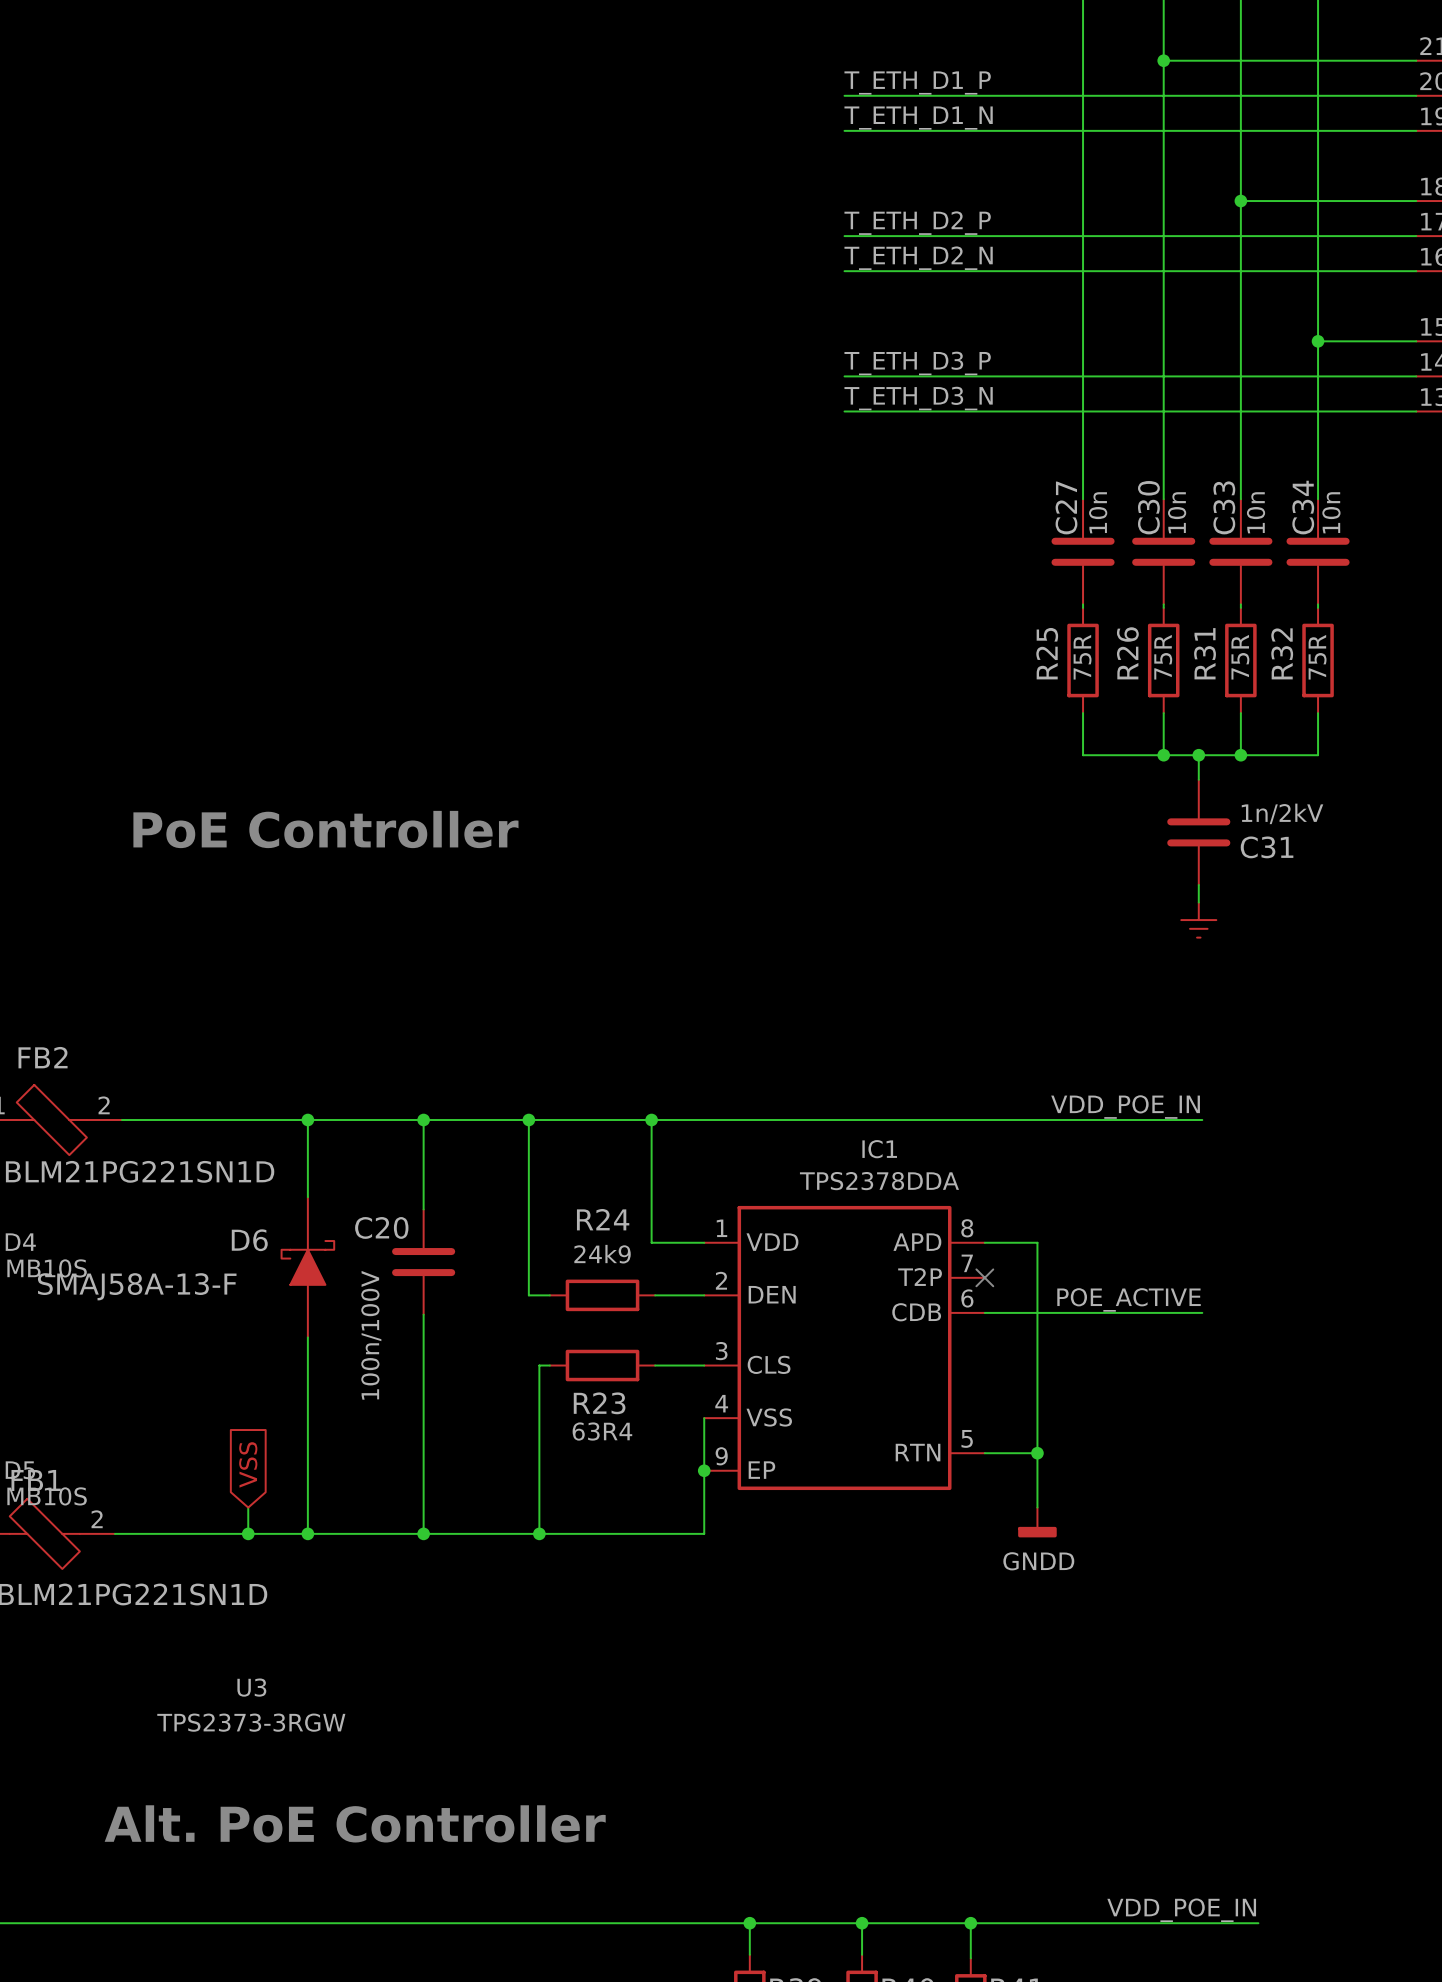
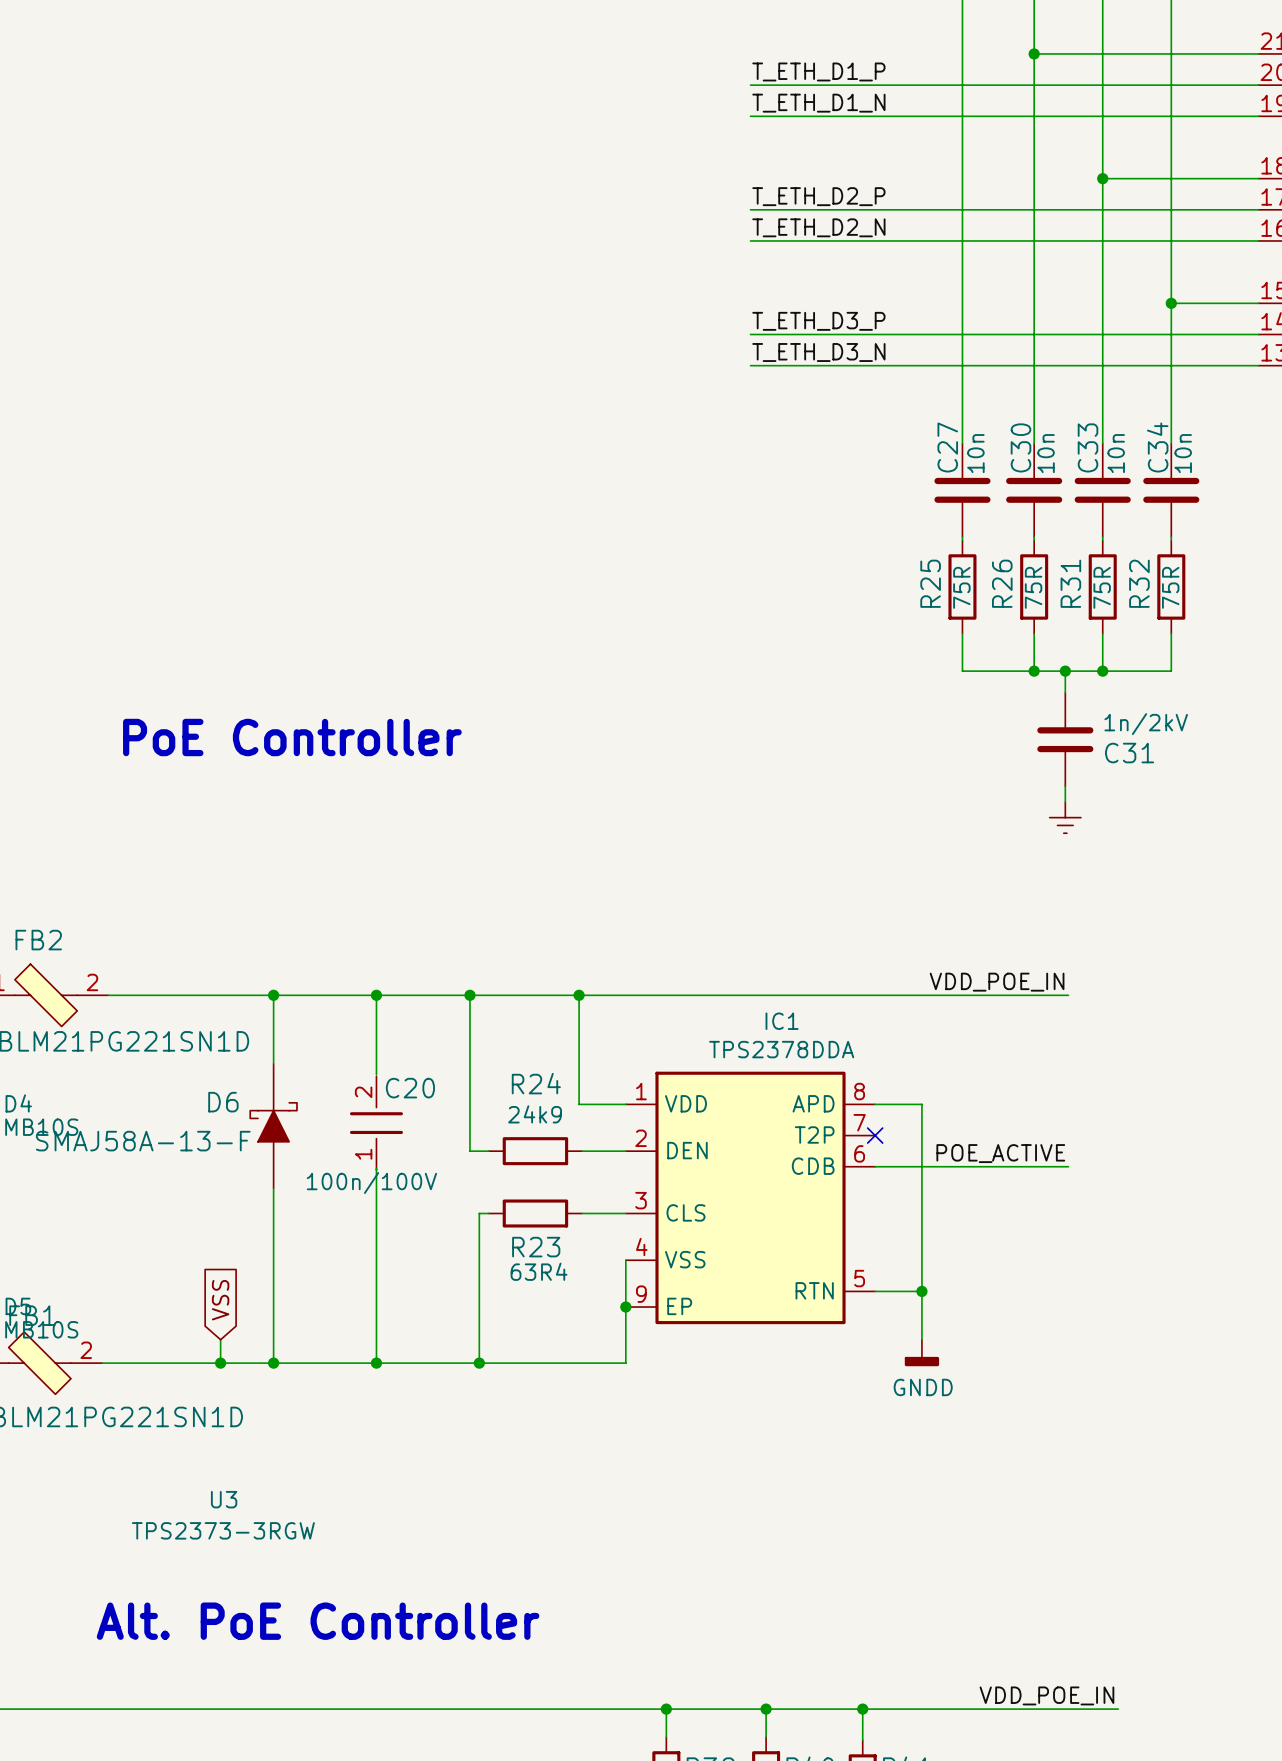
C20 symbol: [392, 1209, 456, 1315] -> [349, 1076, 403, 1170]
C20 name position: C20 (381, 1227) -> C20 (410, 1088)
C20 text position: 100n/100V (371, 1335) -> 100n/100V (371, 1182)

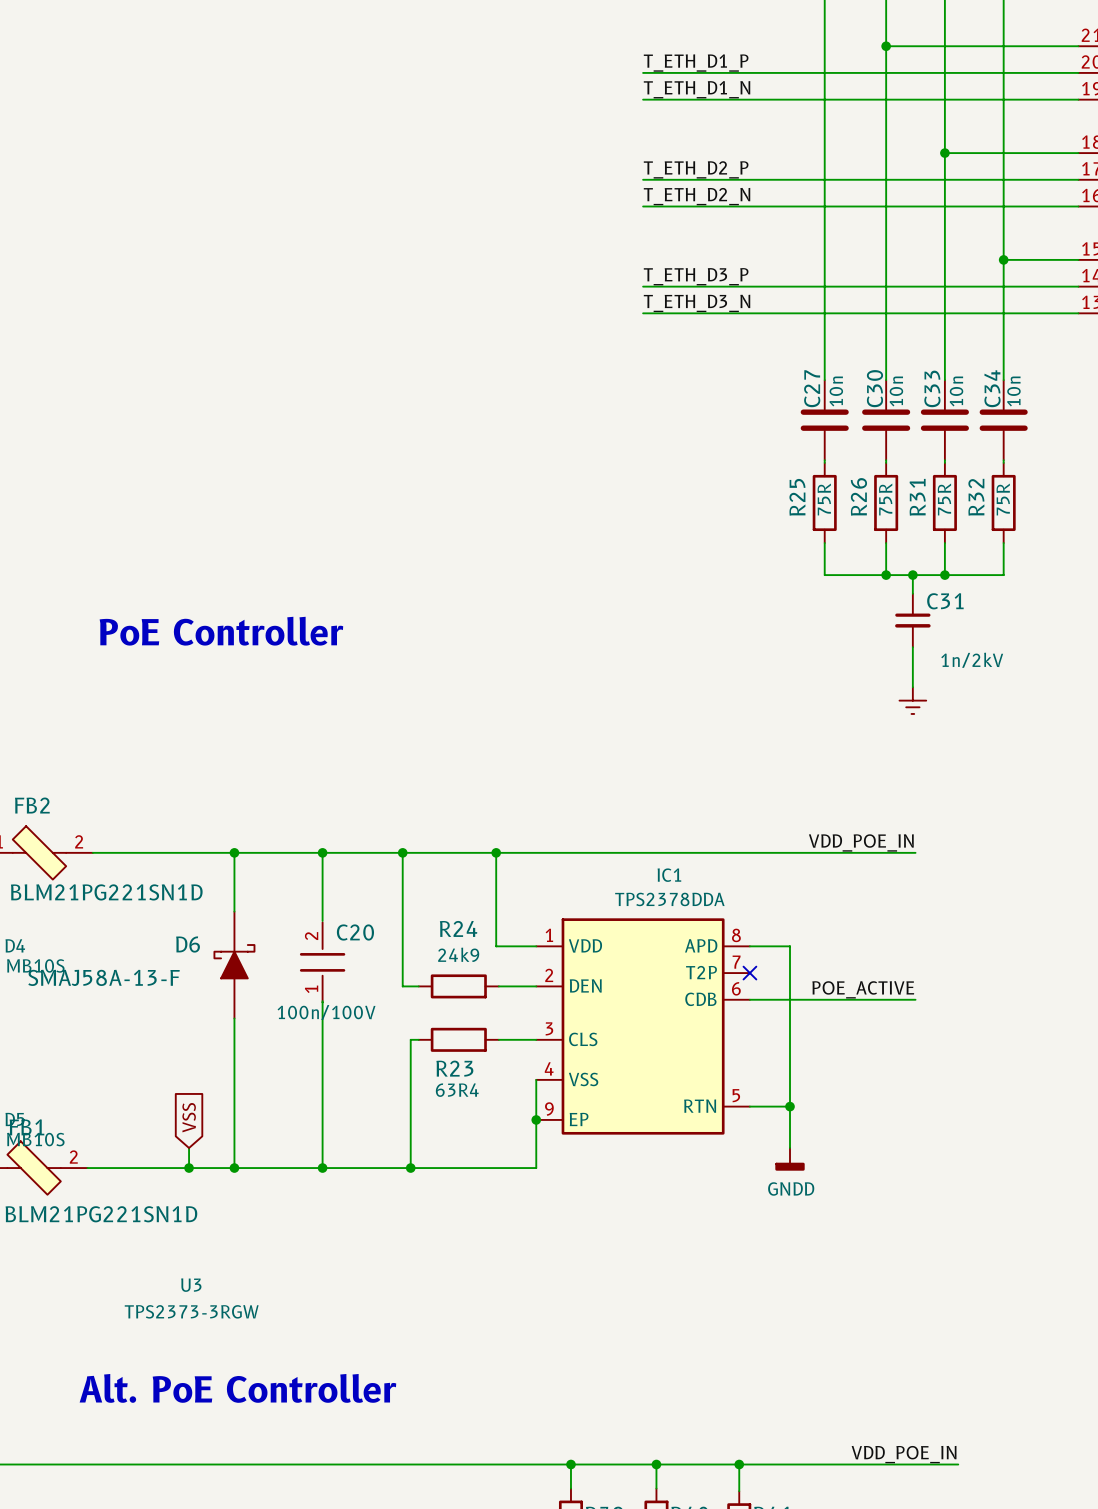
C31 symbol: [1037, 692, 1094, 787] -> [895, 593, 931, 648]
C31 text position: 1n/2kV (1146, 724) -> 1n/2kV (972, 660)
C31 name position: C31 (1129, 753) -> C31 (945, 601)

